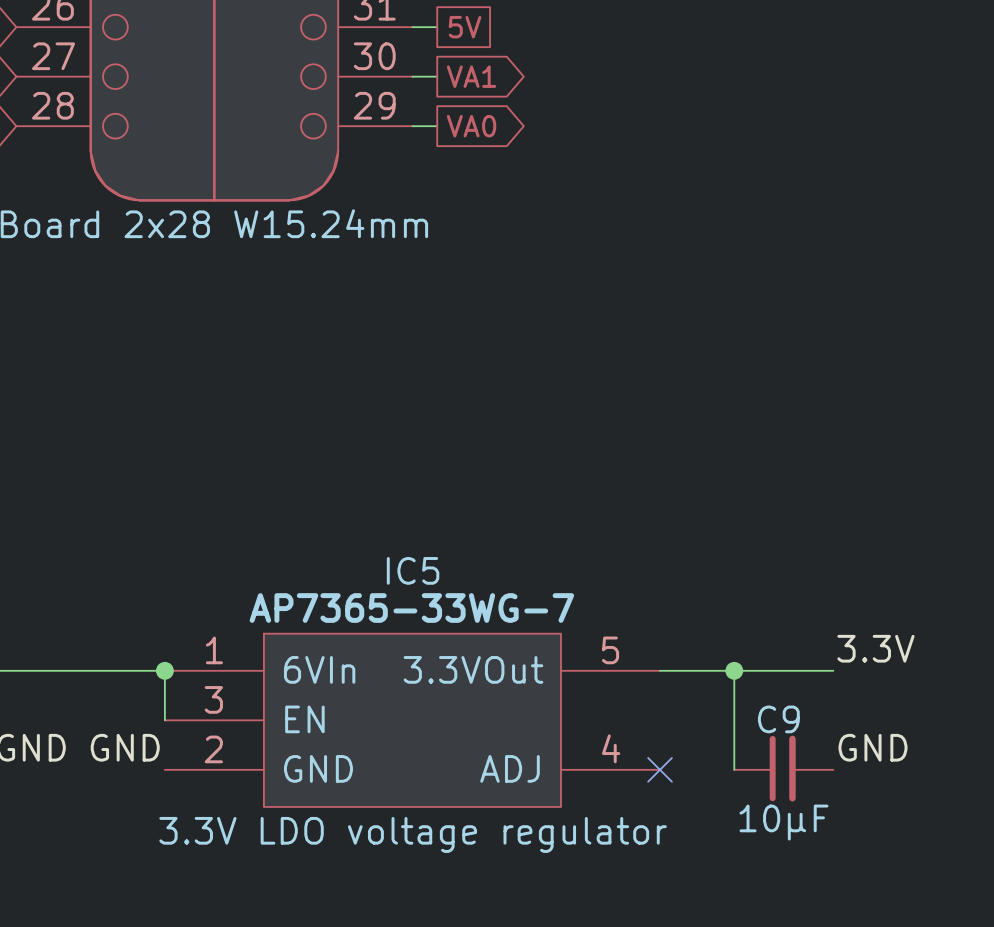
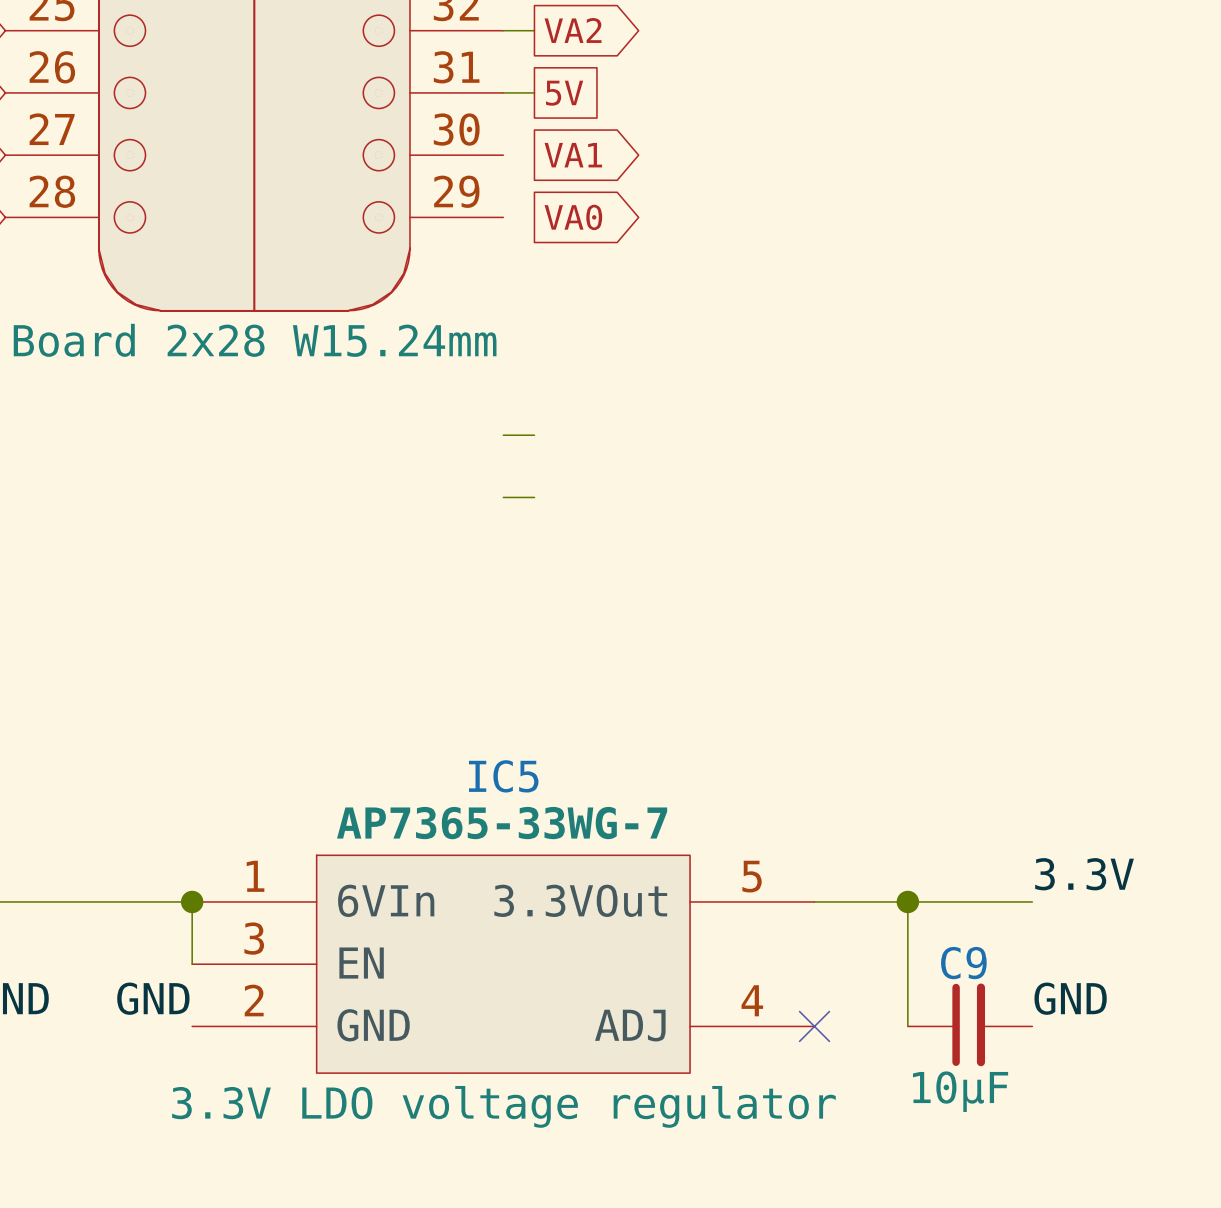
wire: (412, 76) (437, 76) -> (503, 435) (534, 435)
wire: (412, 126) (437, 126) -> (503, 497) (534, 497)

